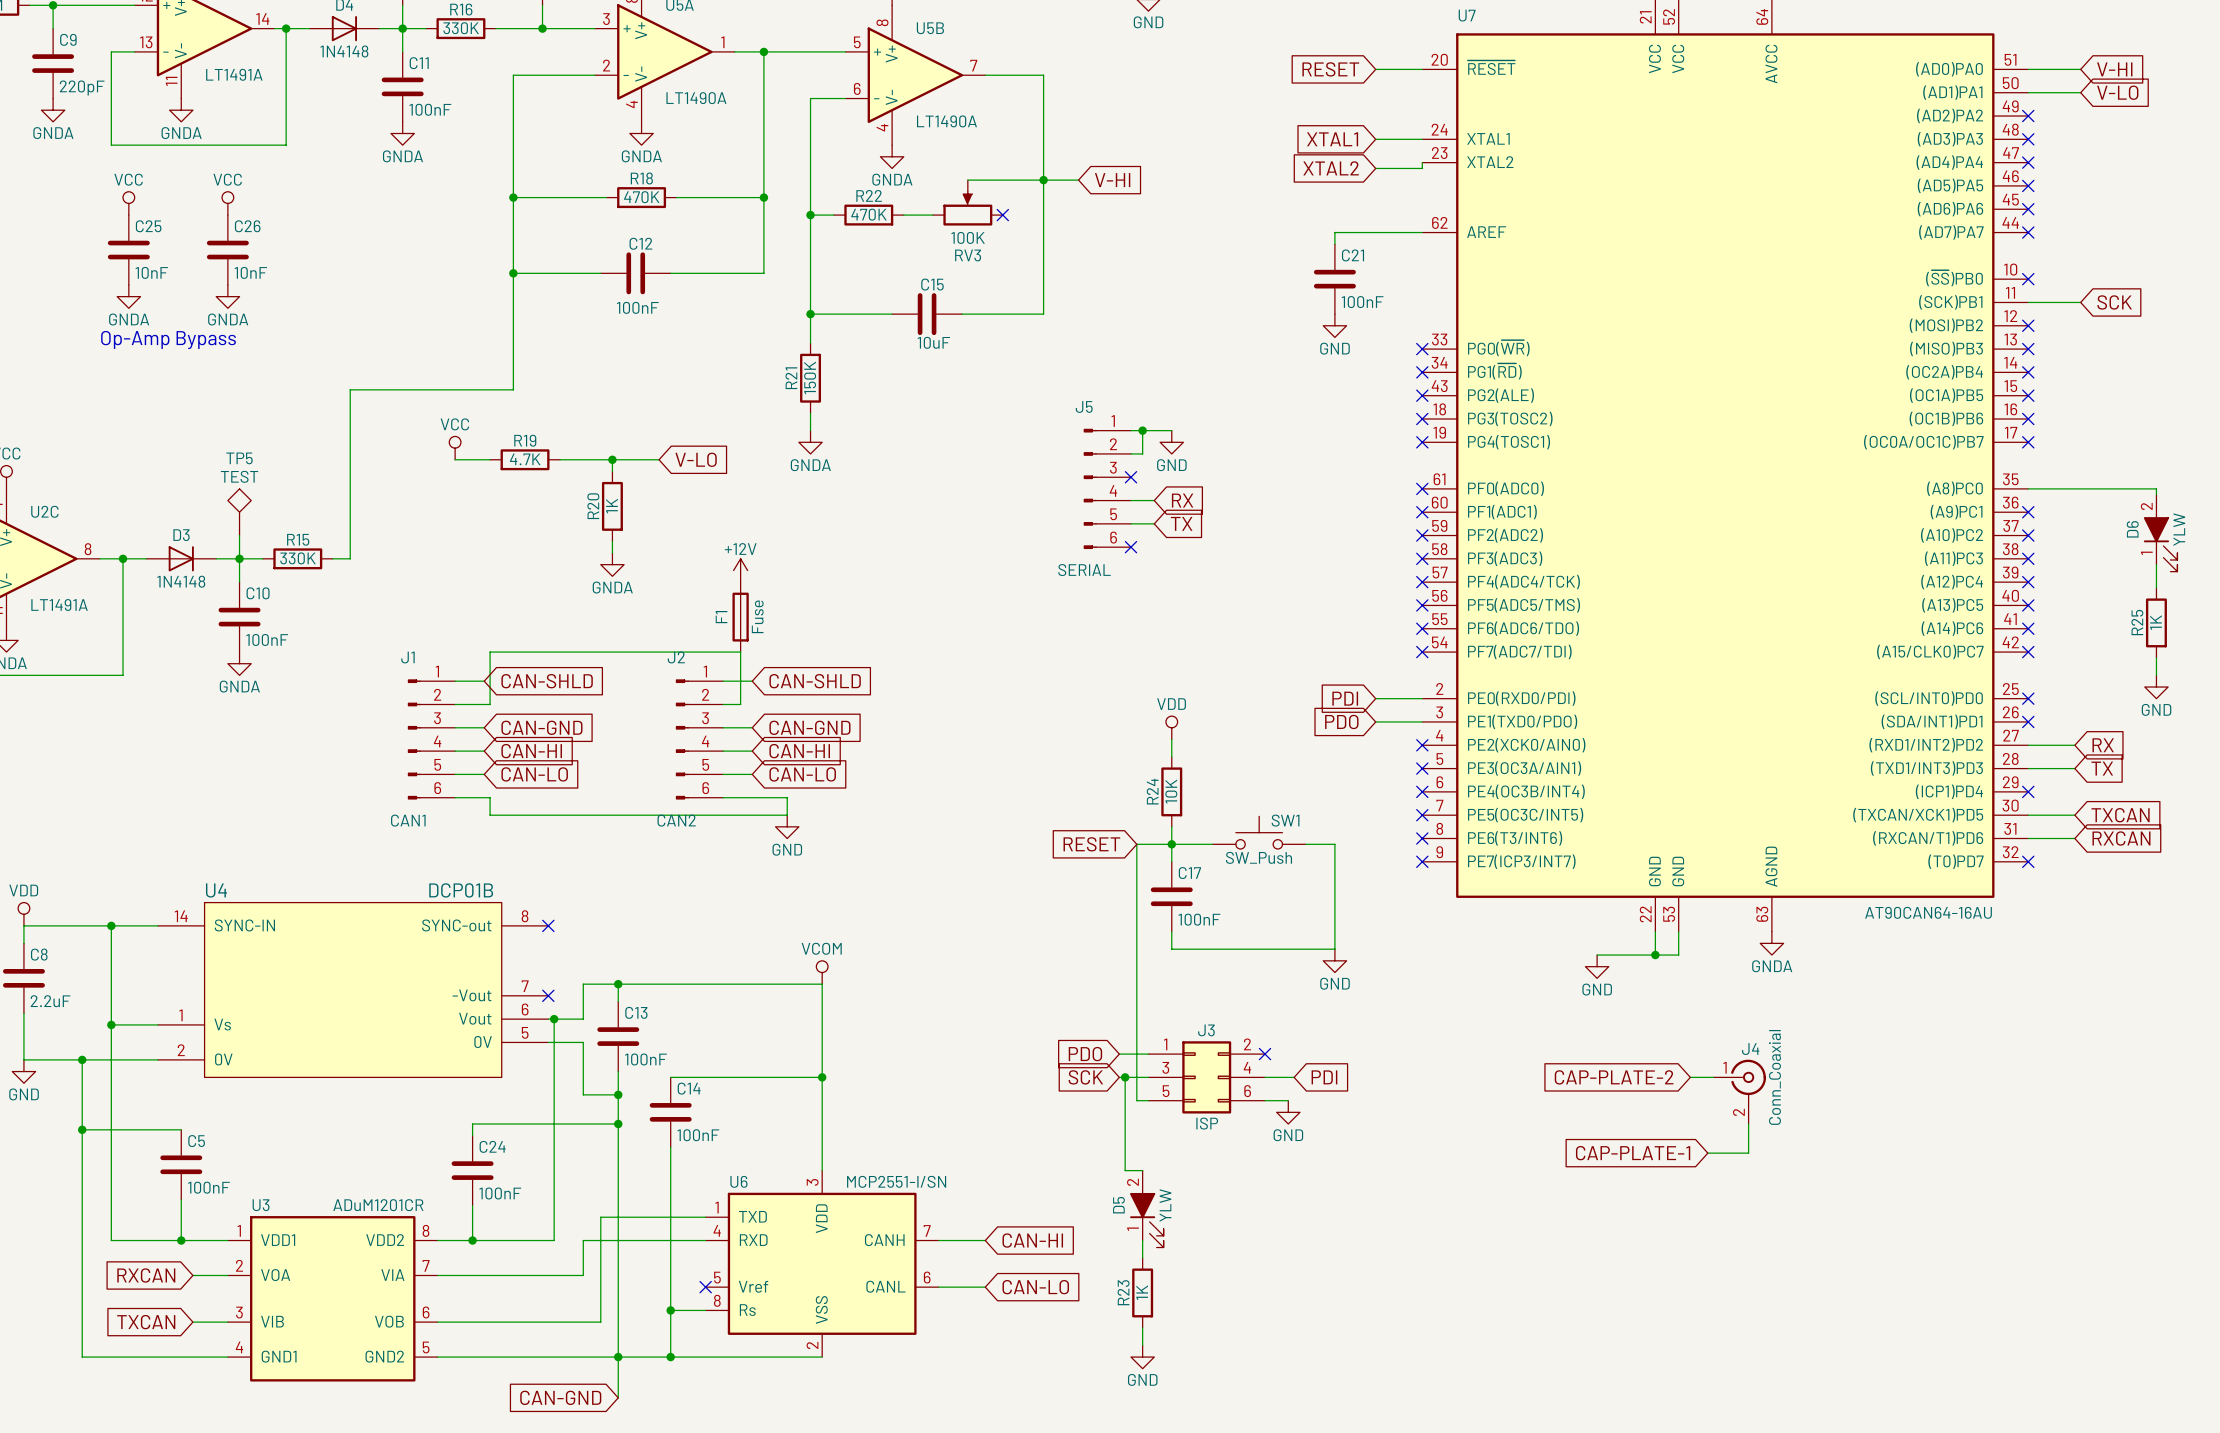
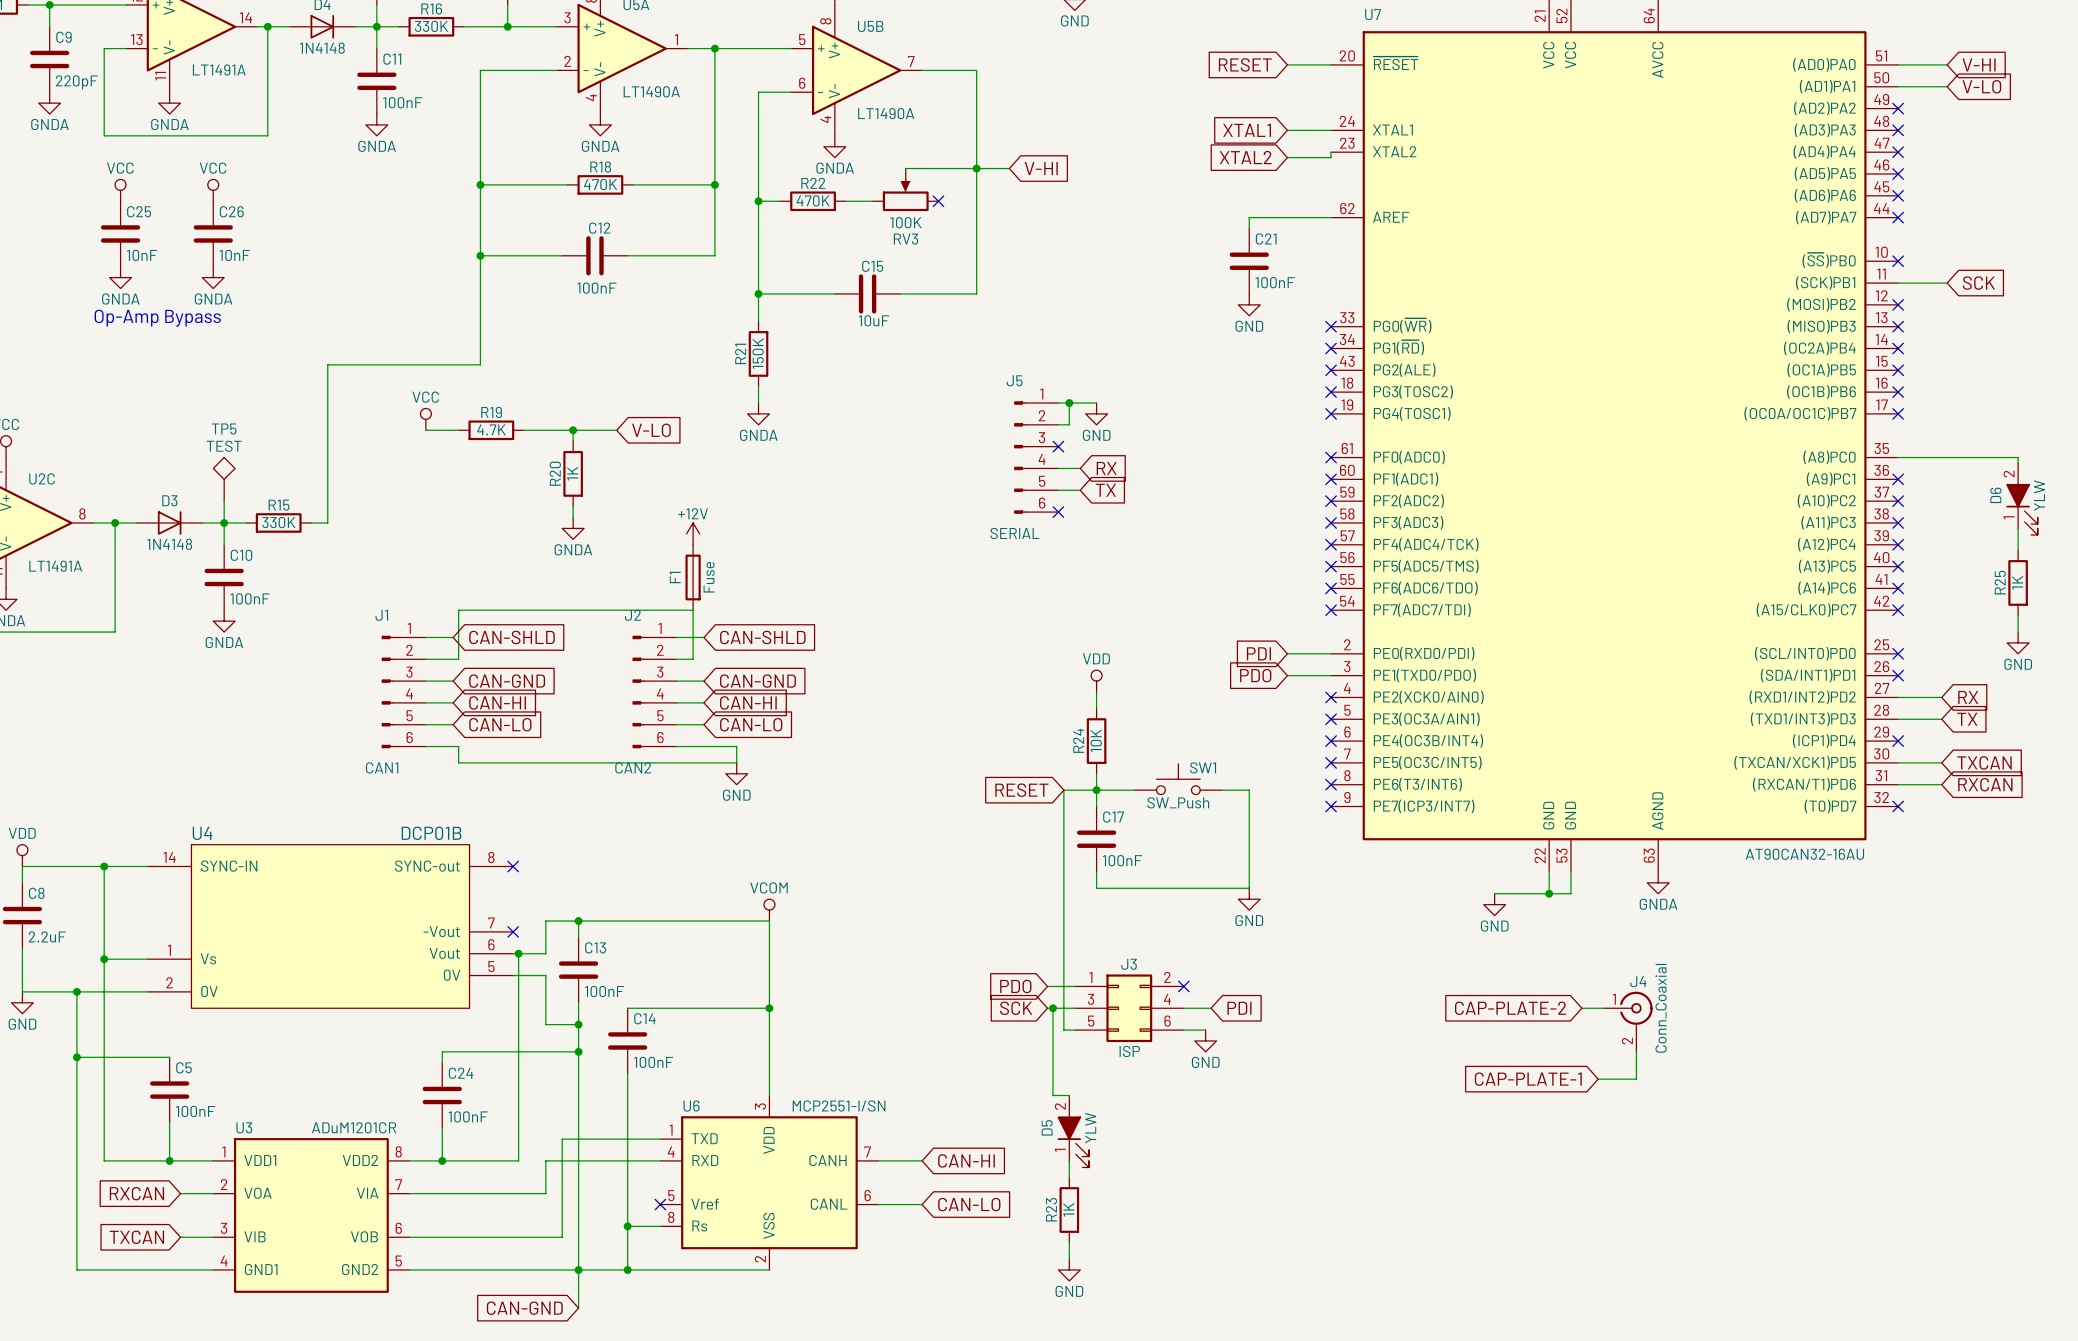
U7 value: AT90CAN64-16AU (1928, 912) -> AT90CAN32-16AU (1804, 854)

